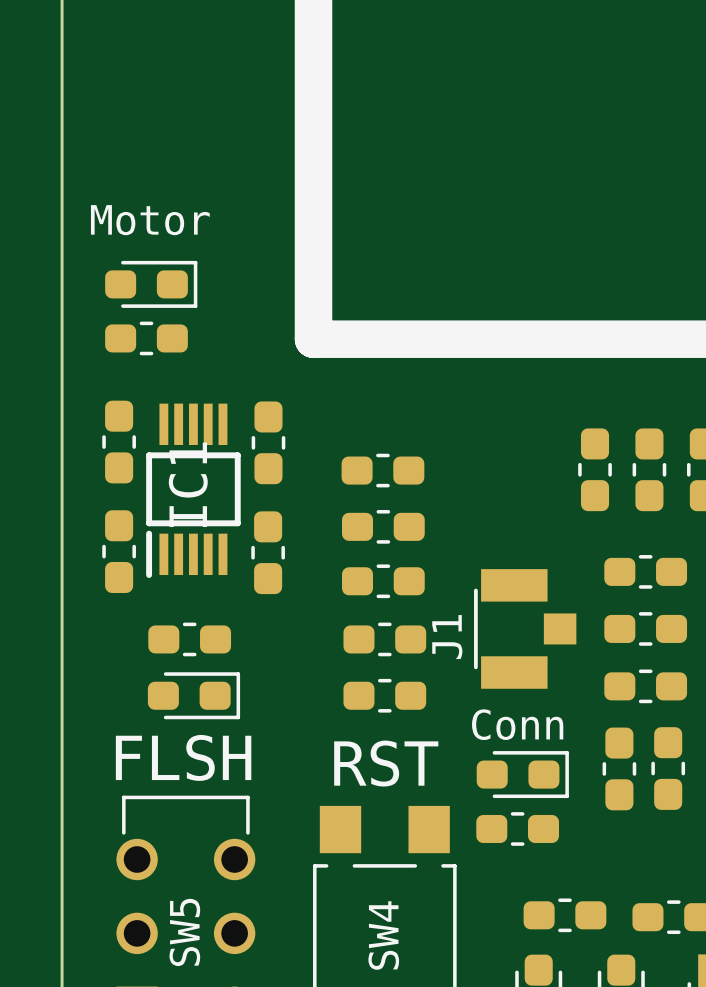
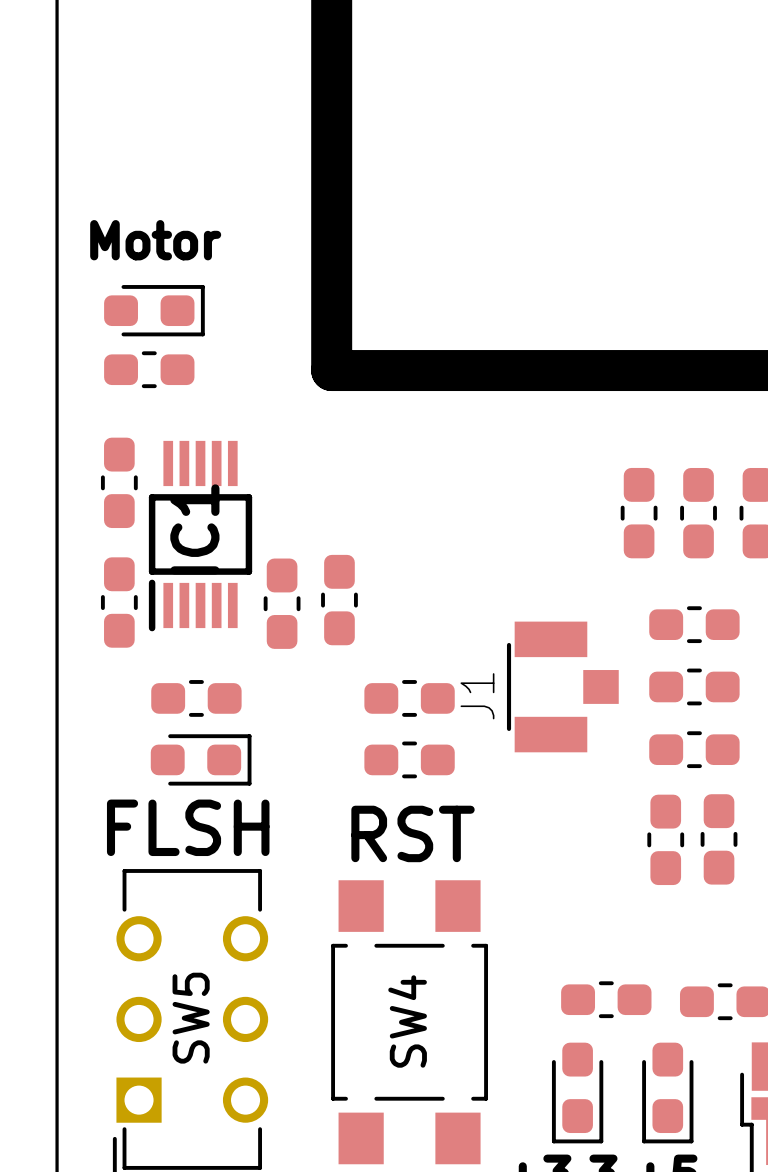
part: (268, 442) -> none
part: (382, 470) -> none
part: (383, 526) -> none
part: none -> (339, 600)
part: (383, 581) -> none
text: Conn (517, 724) -> none
part: (522, 774) -> none
part: (517, 828) -> none

